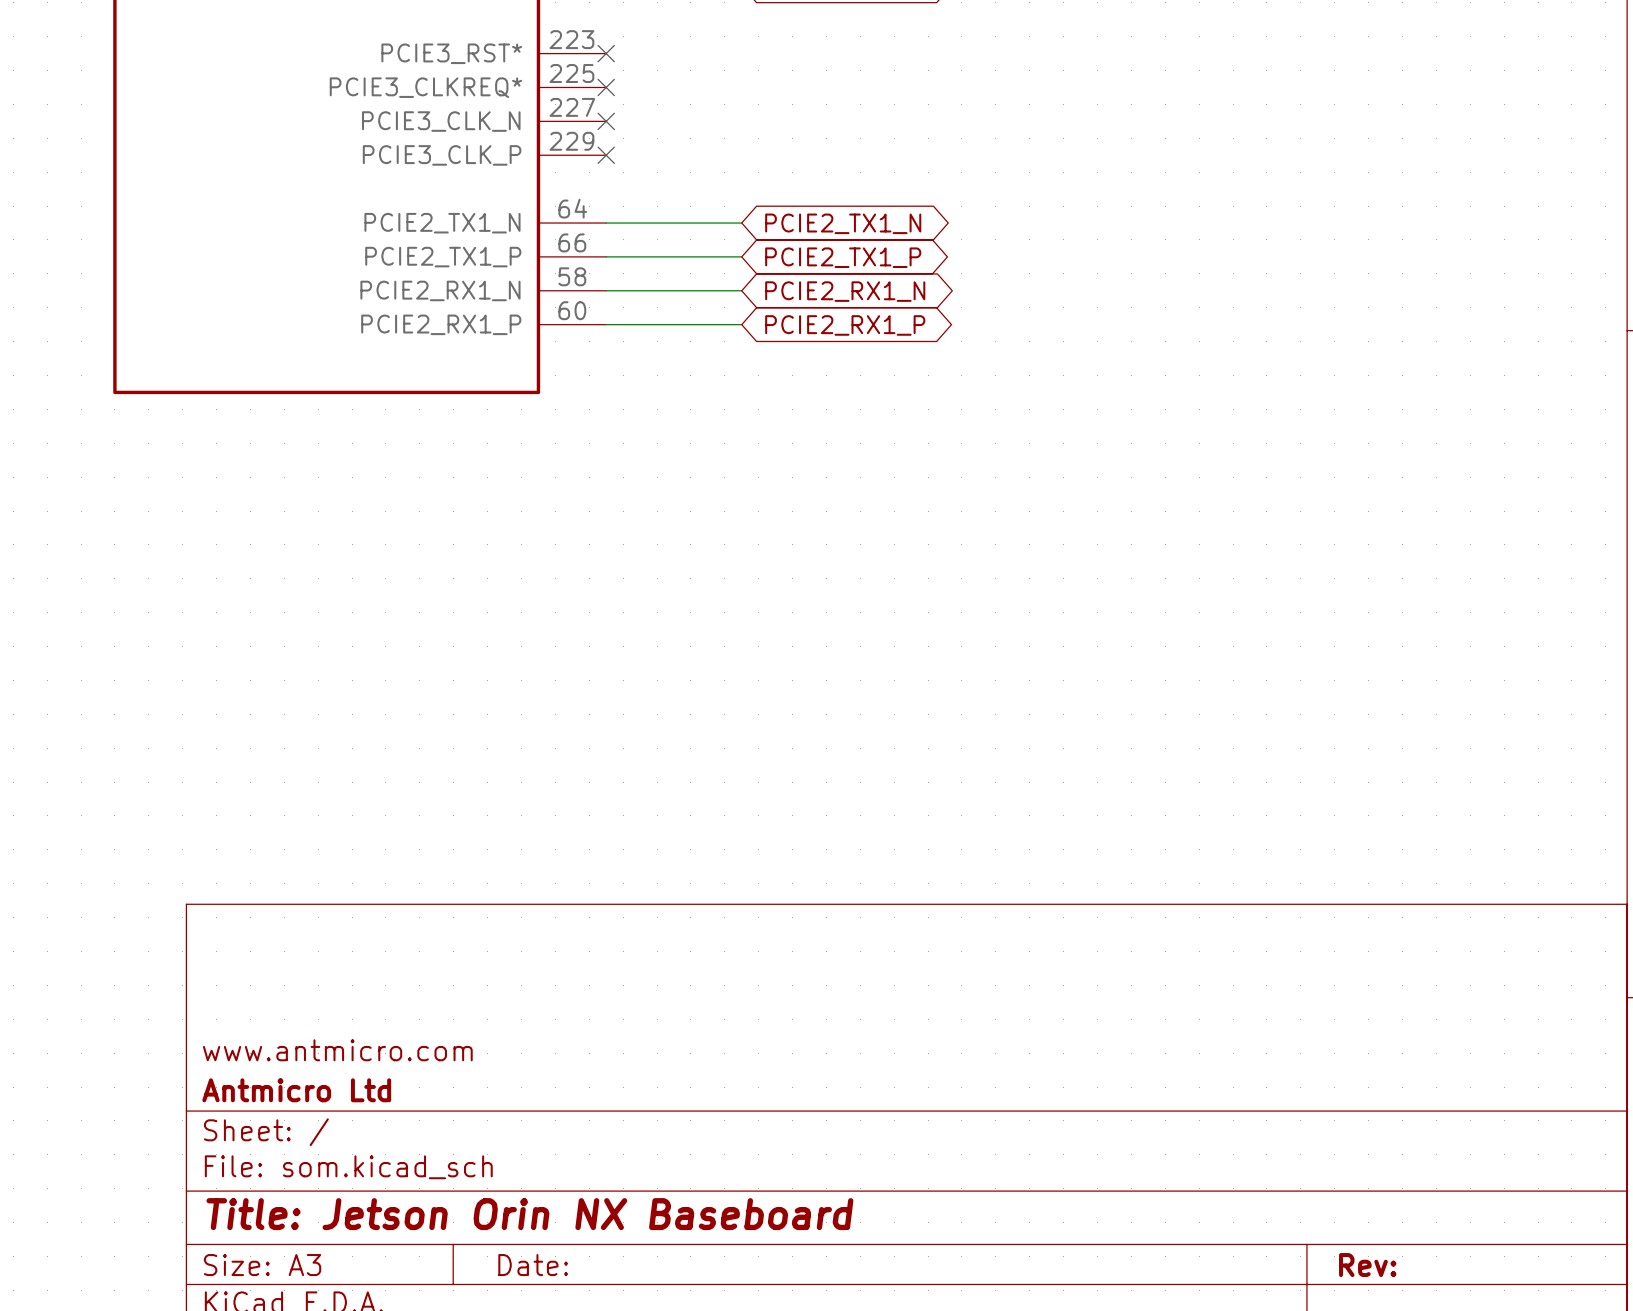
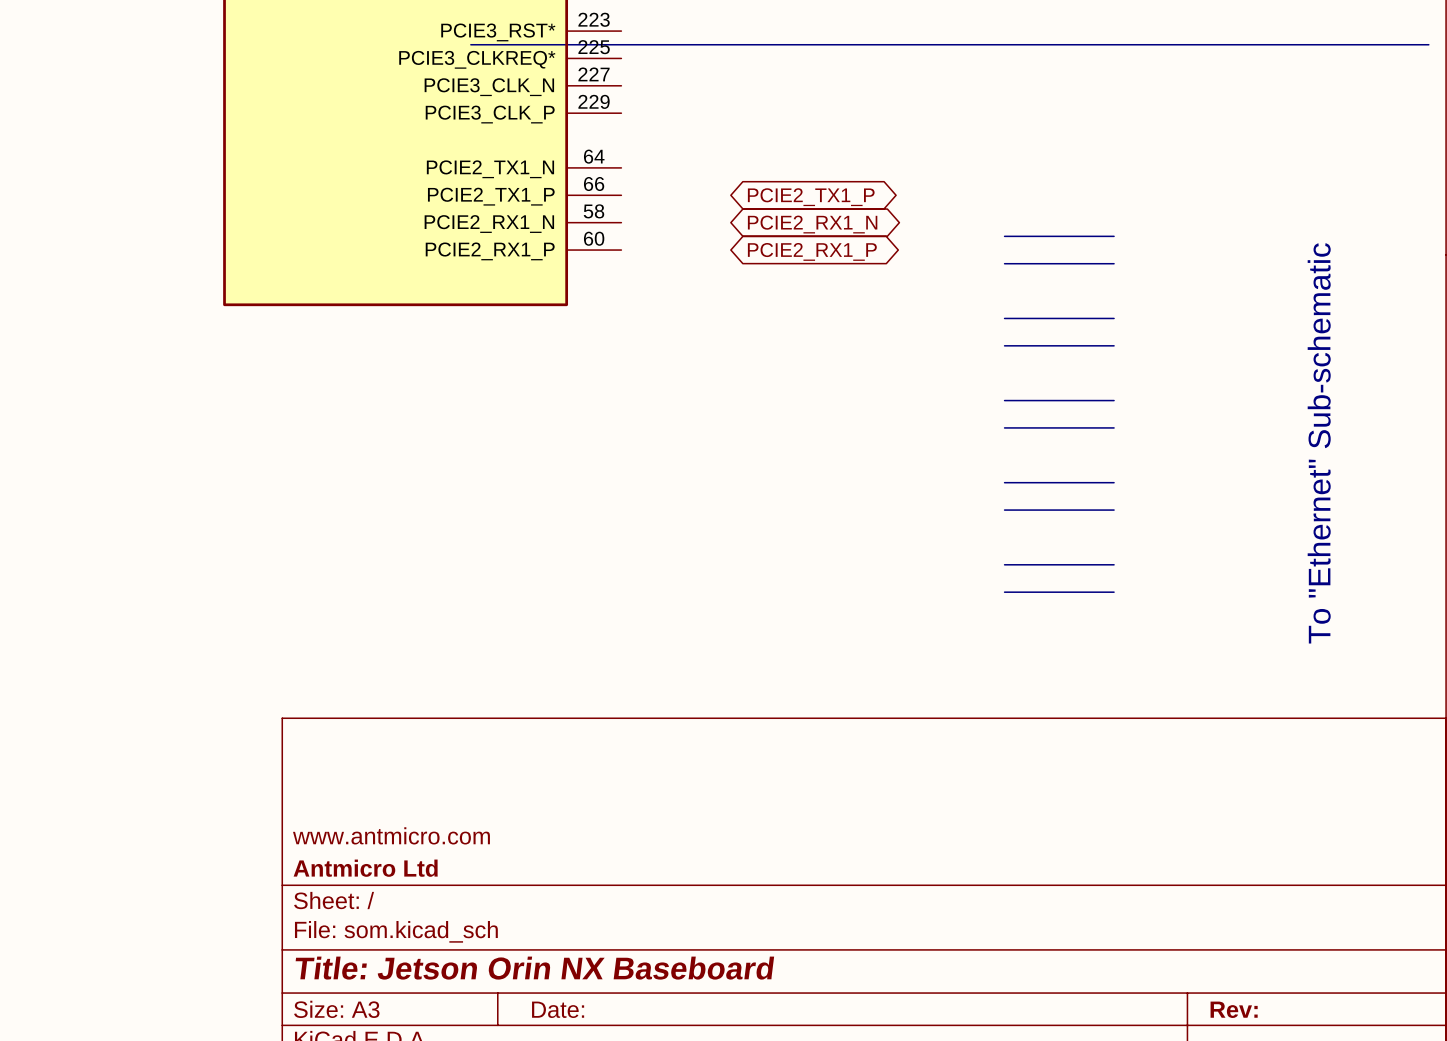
no-connect mark: (606, 53) -> none
line: none -> (470, 44) (1428, 44)
no-connect mark: (606, 87) -> none
no-connect mark: (606, 121) -> none
no-connect mark: (606, 155) -> none
wire: (606, 223) (741, 223) -> none
global label: PCIE2_TX1_N (843, 223) -> none
wire: (606, 256) (741, 256) -> none
wire: (606, 290) (741, 290) -> none
wire: none -> (1004, 236) (1114, 236)
wire: (606, 324) (741, 324) -> none
wire: none -> (1004, 263) (1114, 263)
wire: none -> (1004, 318) (1114, 318)
wire: none -> (1004, 345) (1114, 345)
wire: none -> (1004, 400) (1114, 400)
text: none -> To "Ethernet" Sub-schematic (1319, 443)
wire: none -> (1004, 427) (1114, 427)
wire: none -> (1004, 482) (1114, 482)
wire: none -> (1004, 510) (1114, 510)
wire: none -> (1004, 564) (1114, 564)
wire: none -> (1004, 592) (1114, 592)

